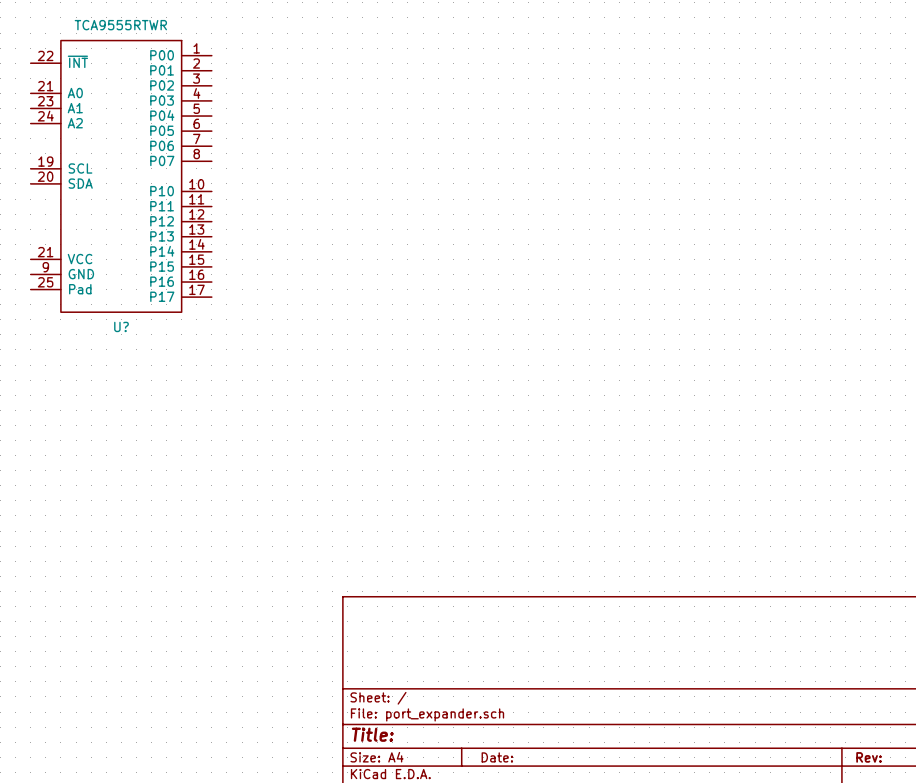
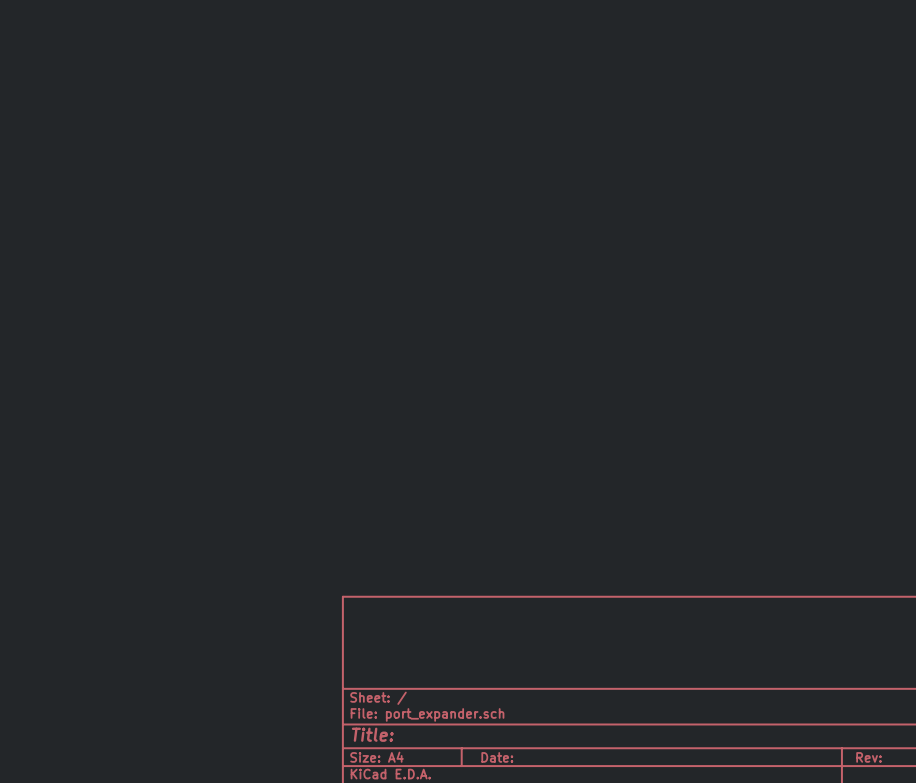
U?: TCA9555RTWR (121, 176) -> none

